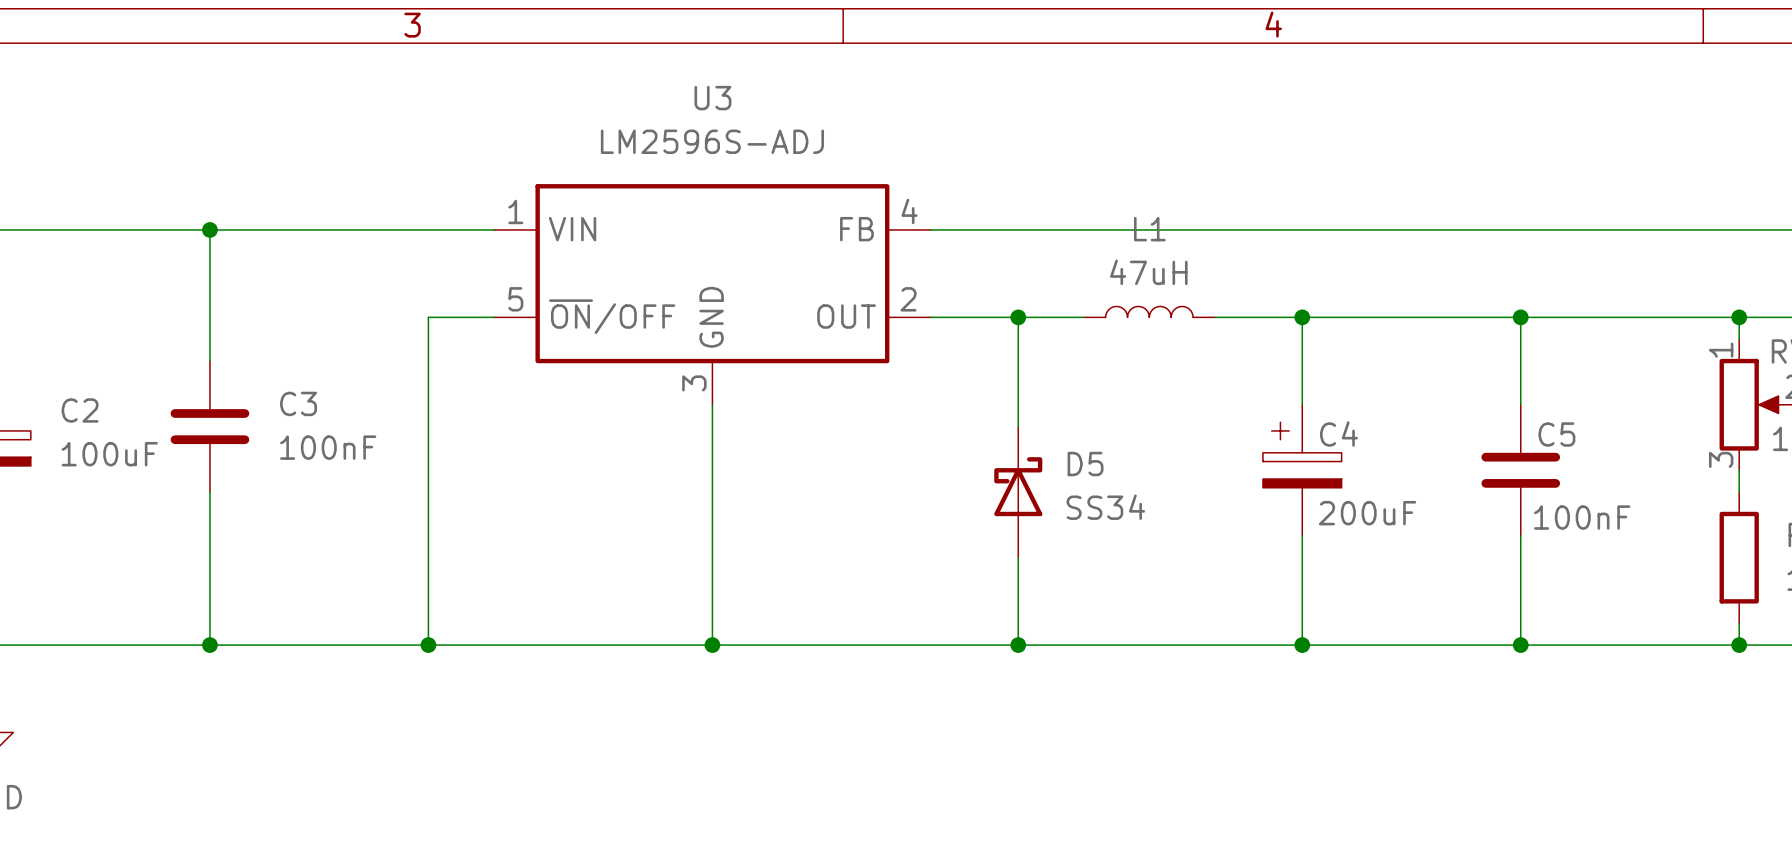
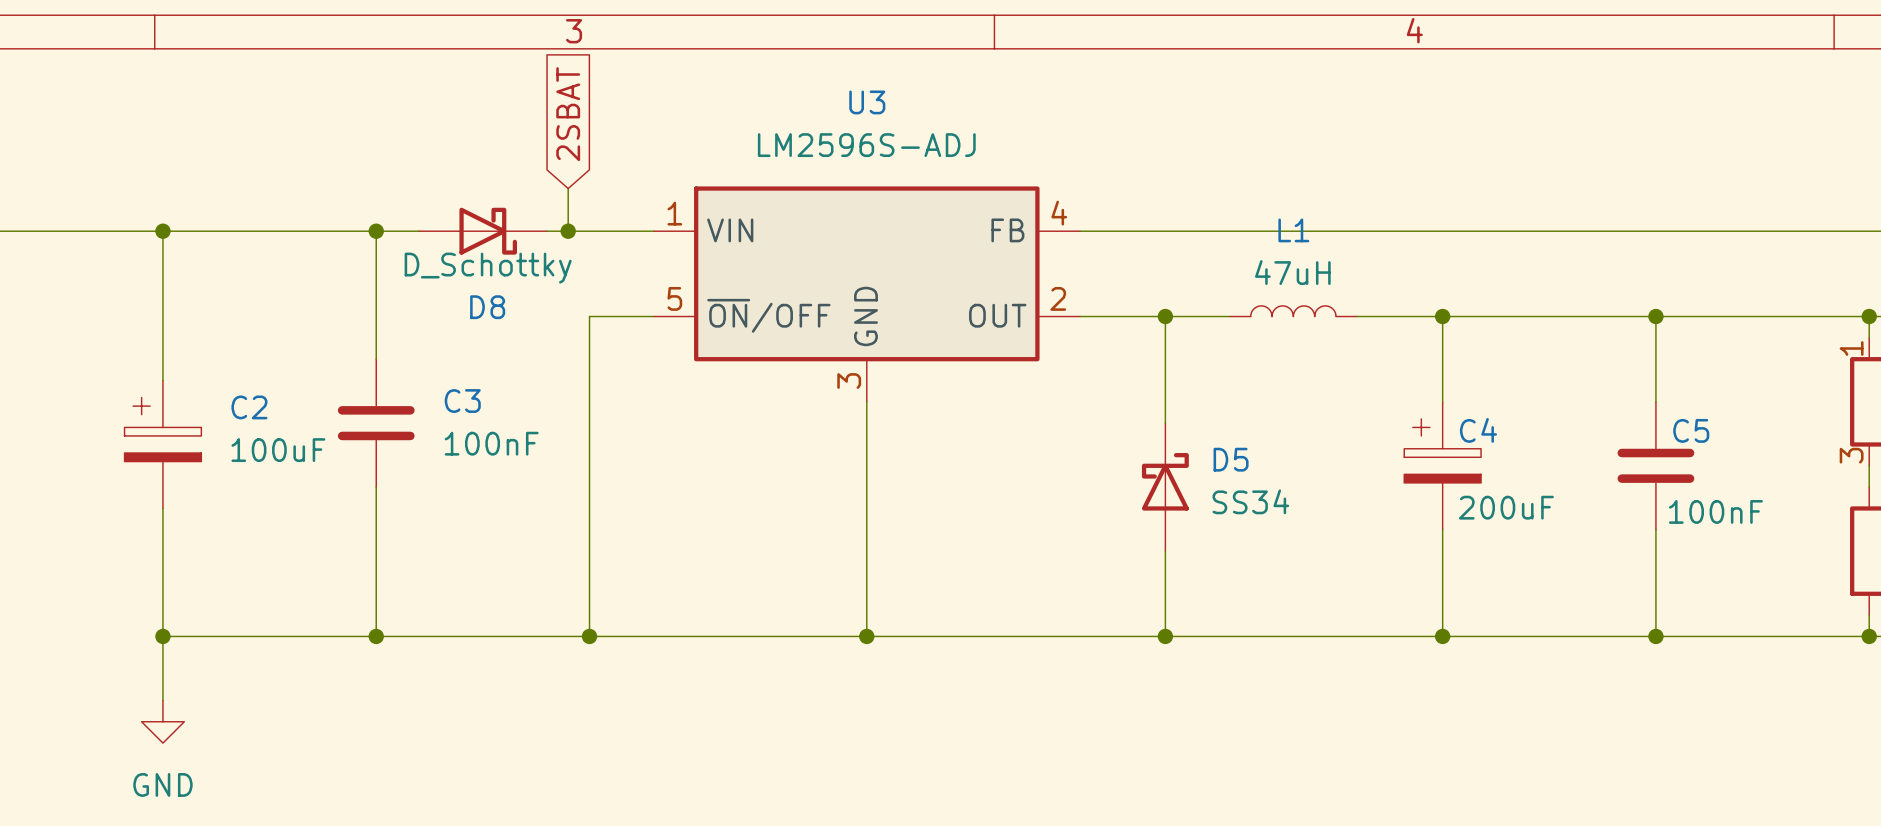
global label: none -> 2SBAT (568, 114)
wire: none -> (568, 188) (568, 231)
D8: none -> D_Schottky (482, 231)
junction: none -> (568, 231)

